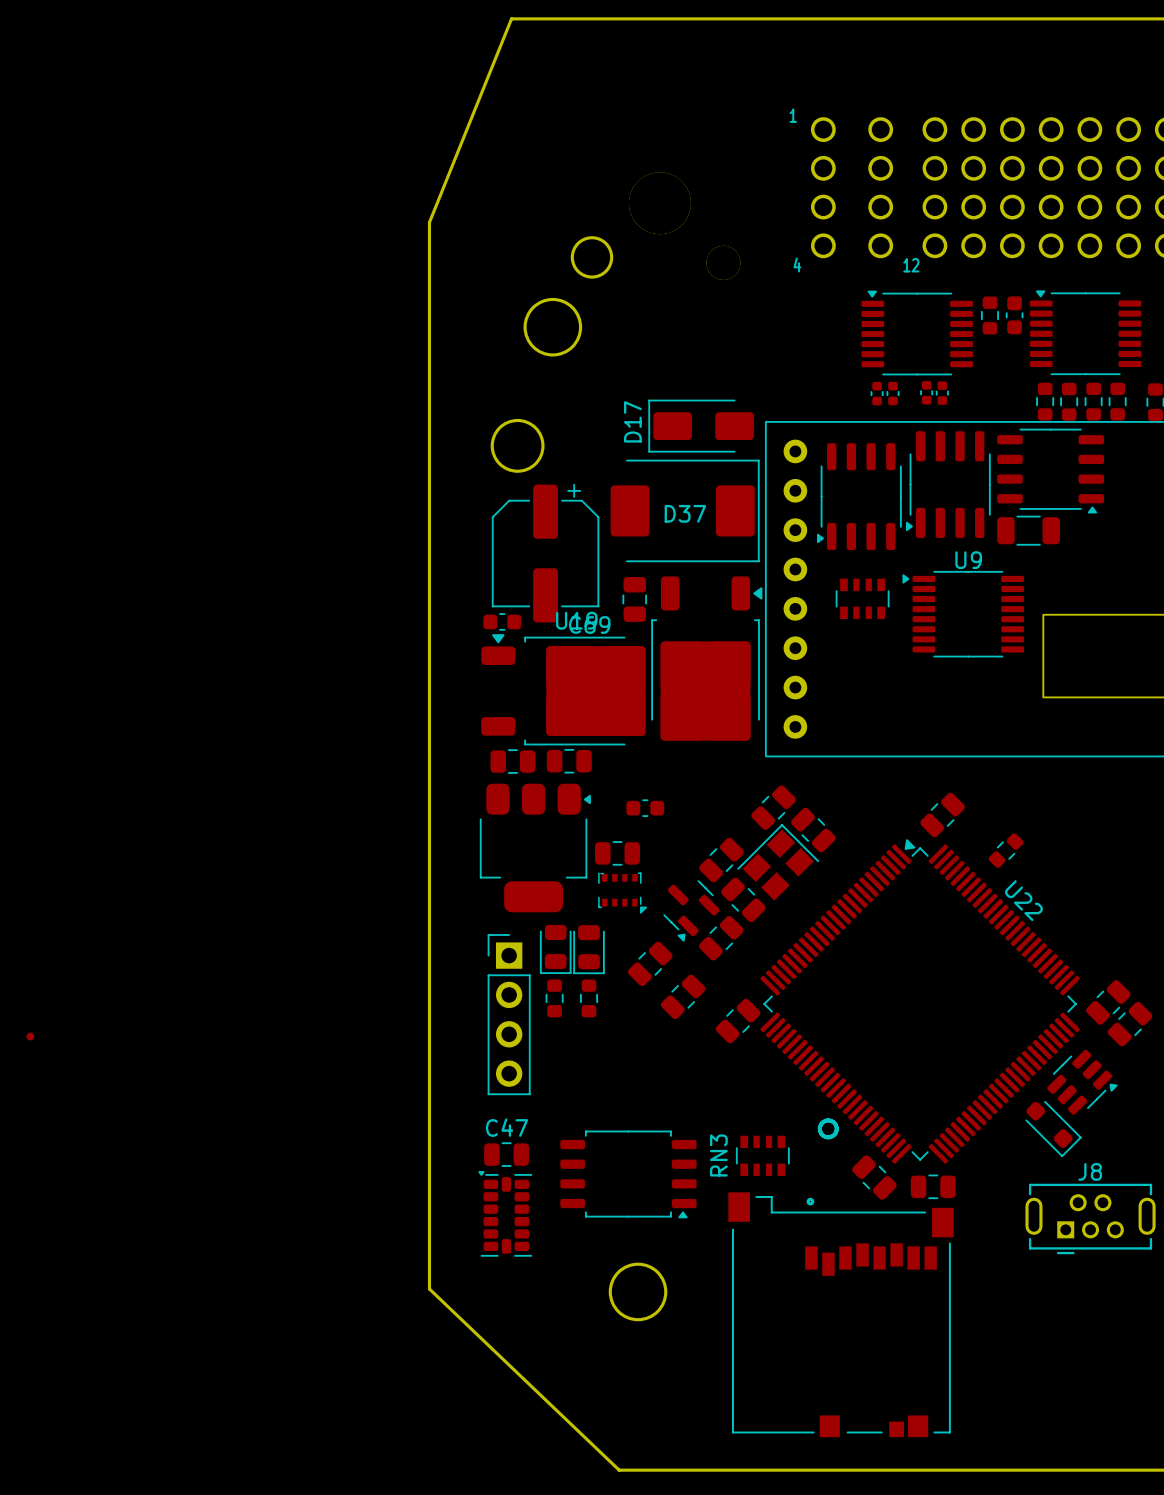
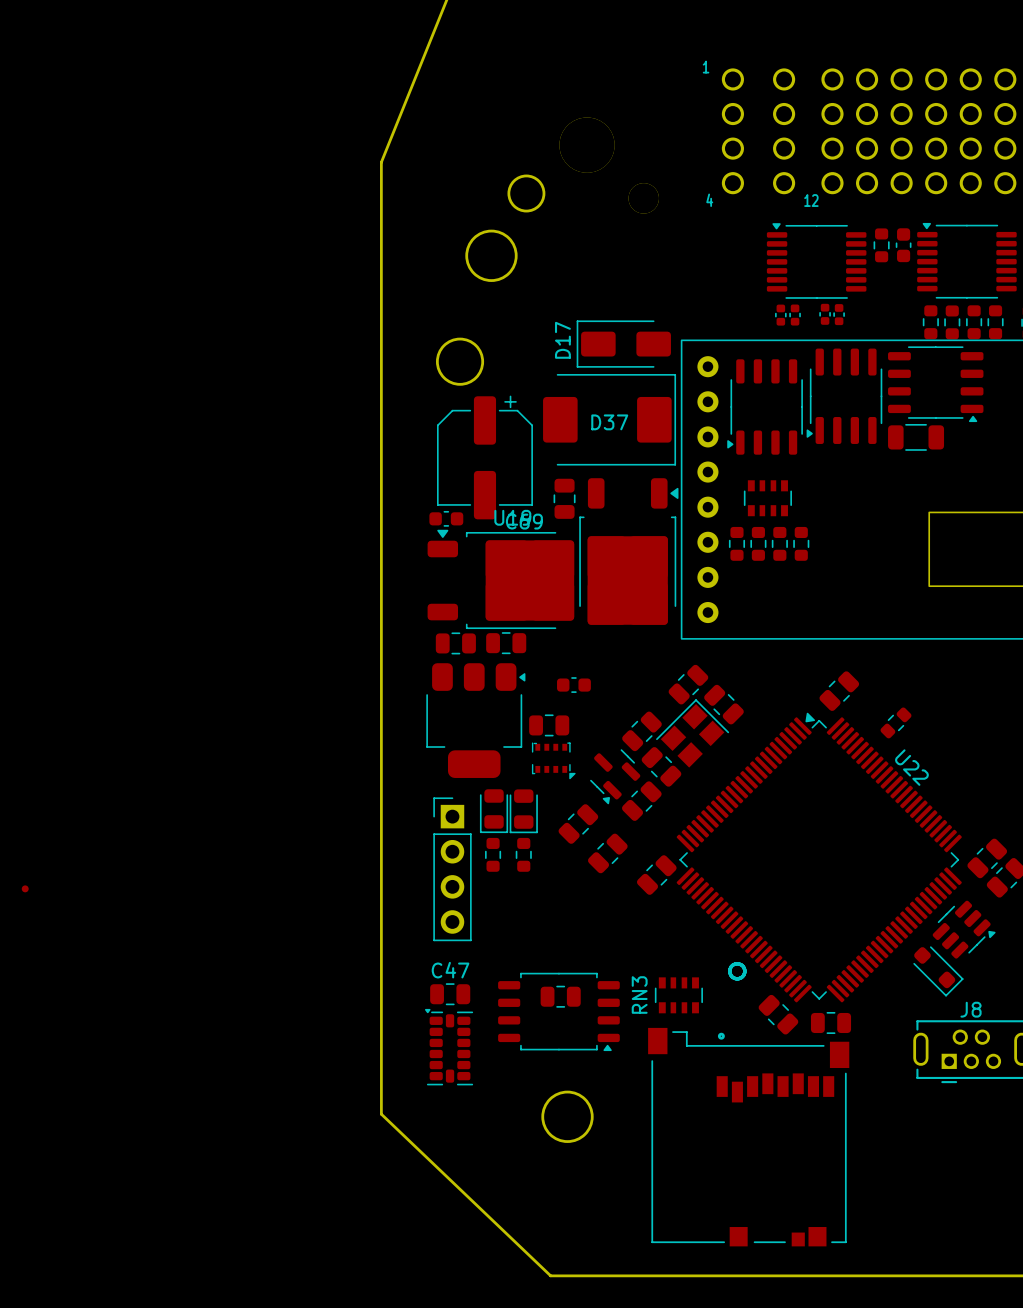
U9: (963, 614) -> none
part: none -> (736, 543)
part: none -> (758, 543)
part: none -> (779, 543)
part: none -> (801, 543)
part: none -> (560, 996)

